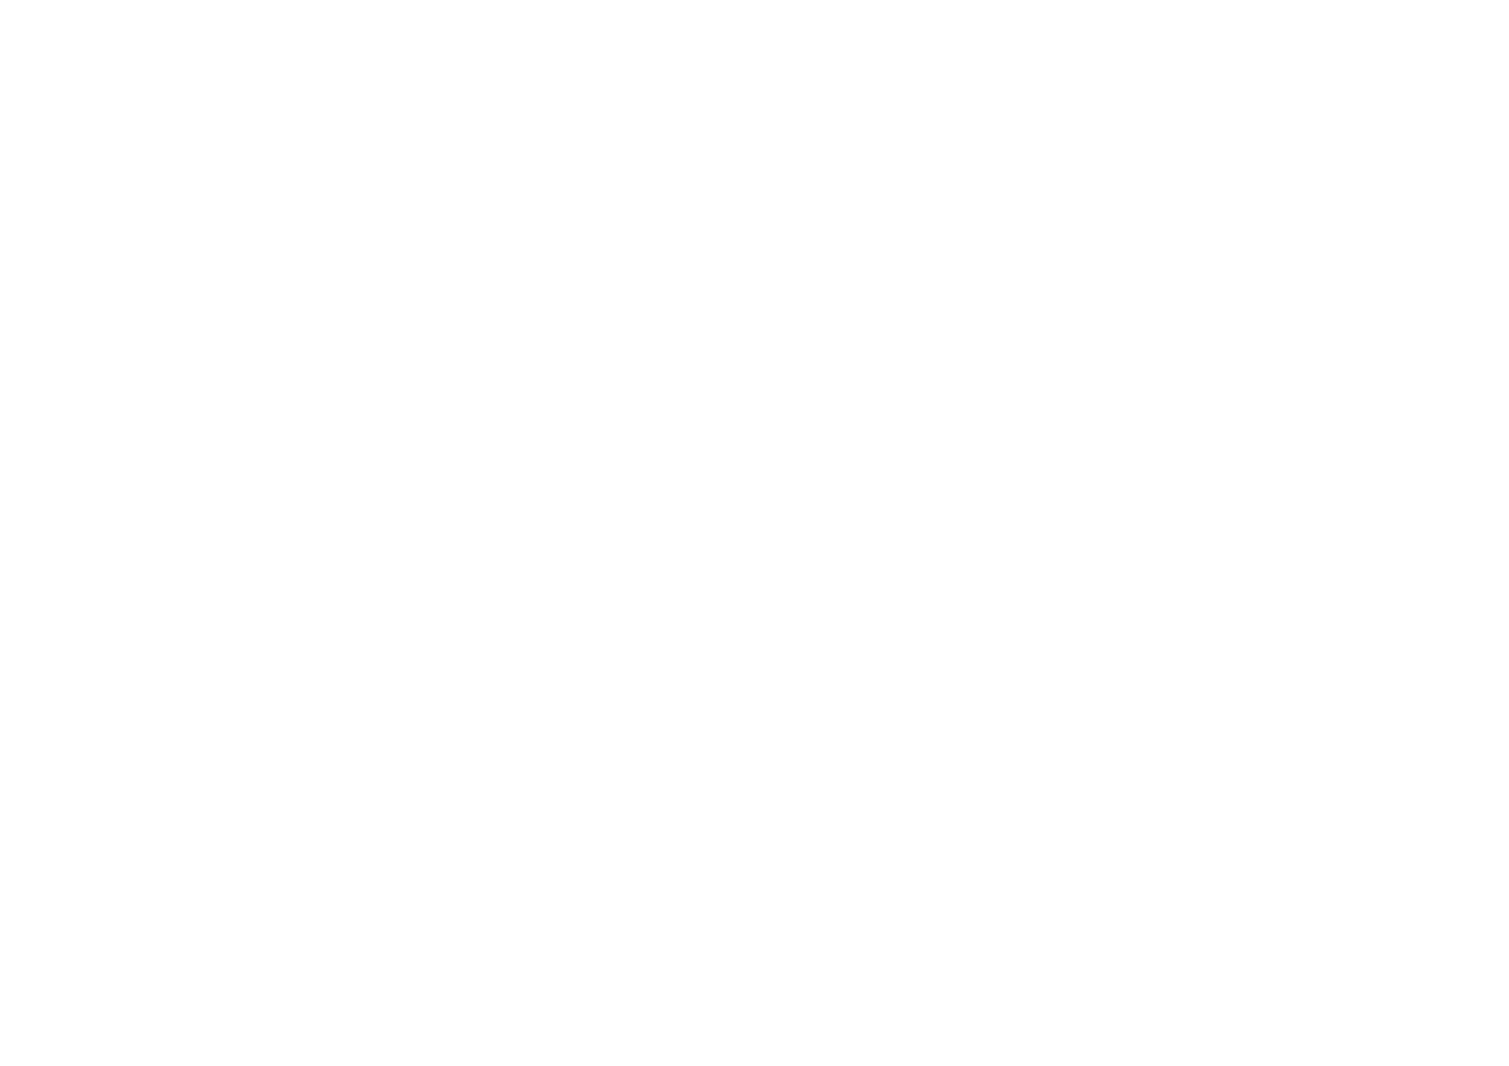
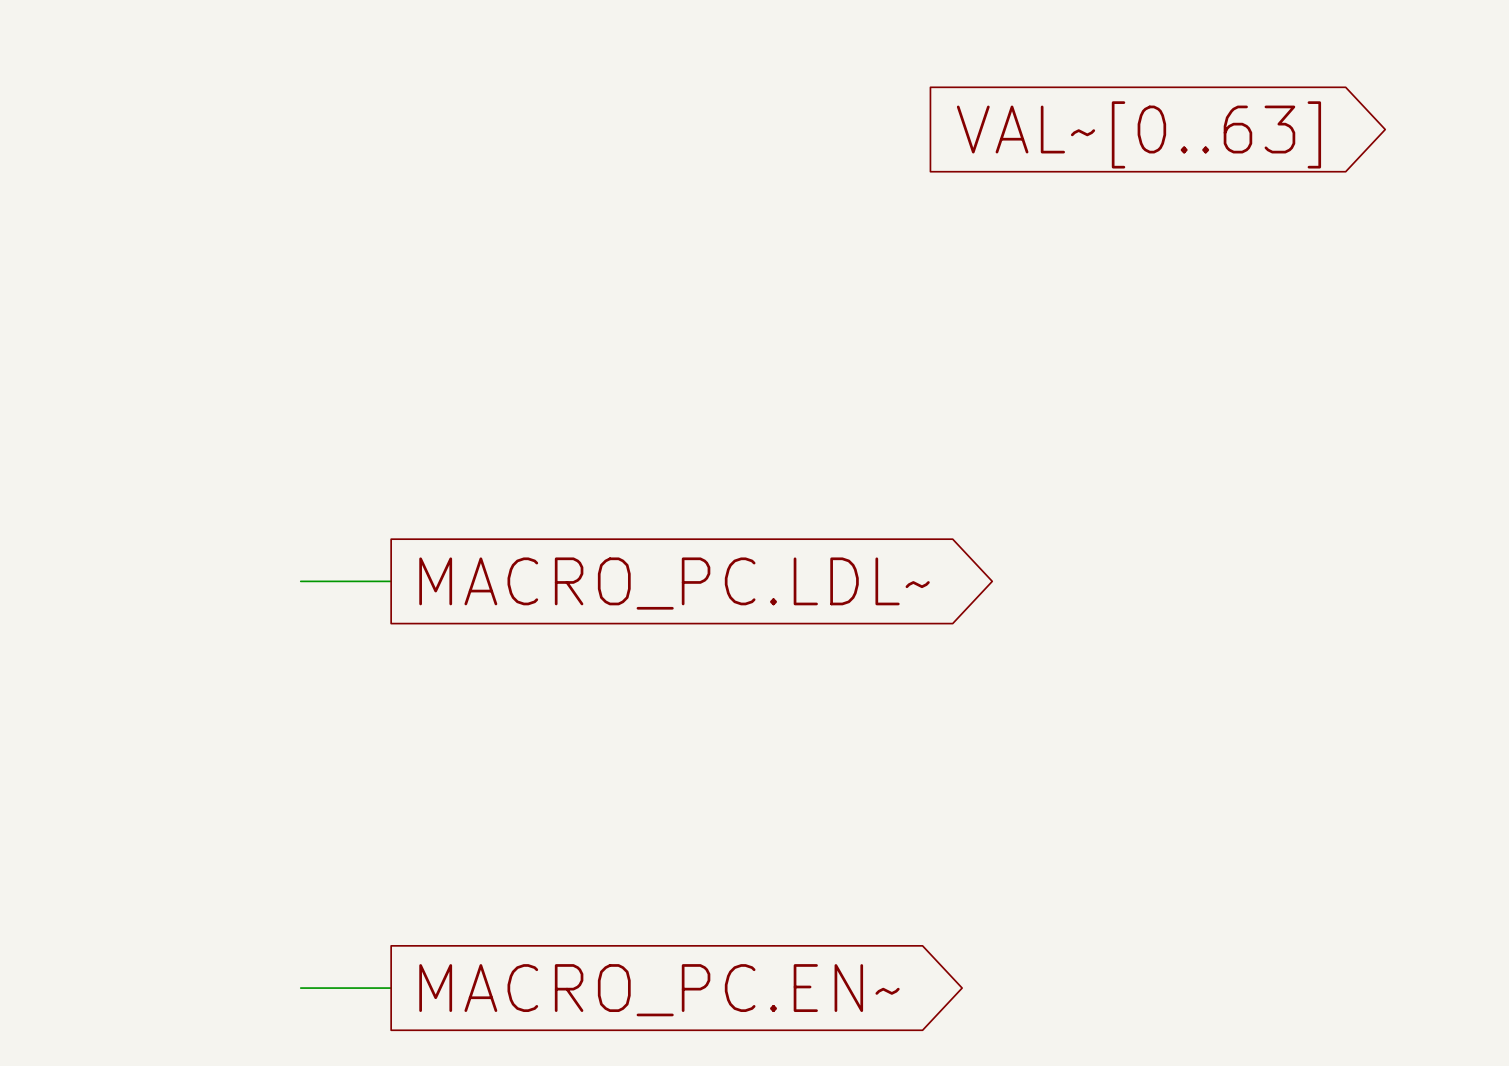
global label: none -> VAL~[0..63] (1138, 134)
wire: none -> (300, 581) (391, 581)
global label: none -> MACRO_PC.LDL~ (674, 583)
wire: none -> (300, 988) (391, 988)
global label: none -> MACRO_PC.EN~ (659, 990)

